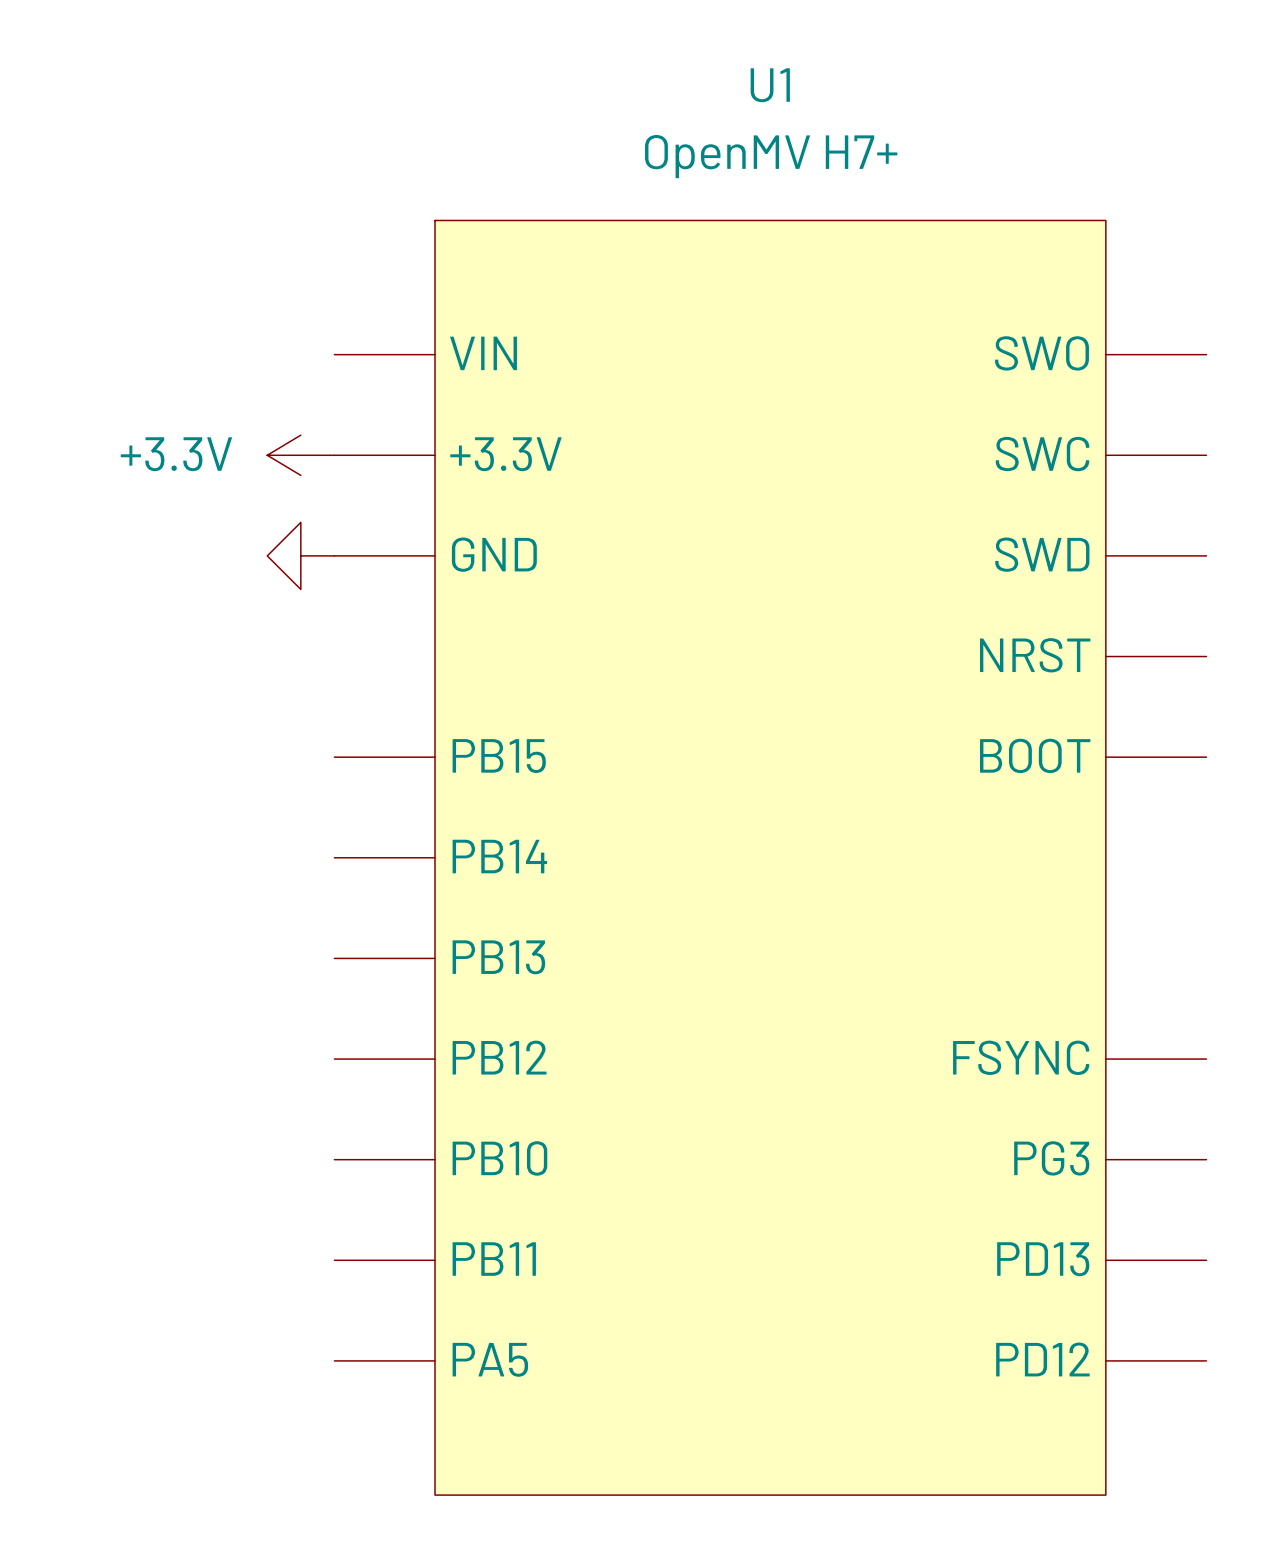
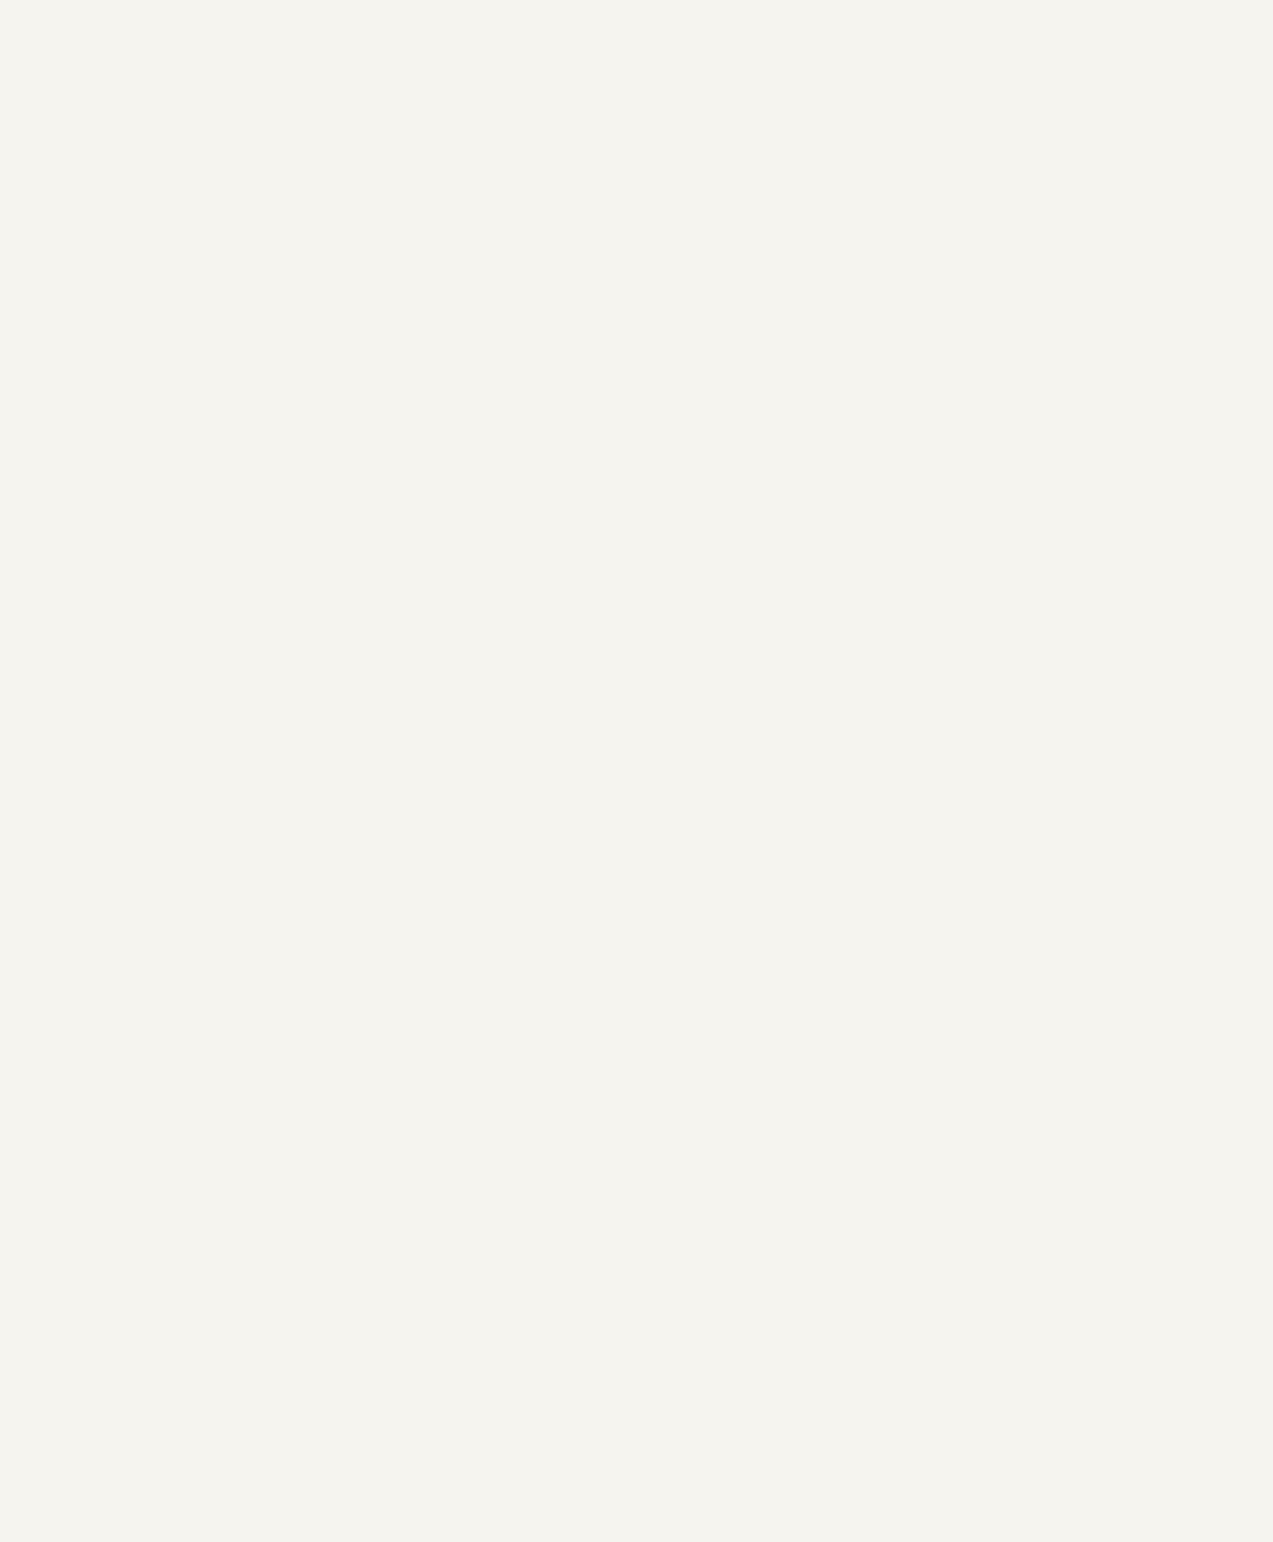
power symbol: +3.3V (300, 455) -> none
power symbol: (300, 555) -> none
U1: OpenMV H7+ (770, 857) -> none

